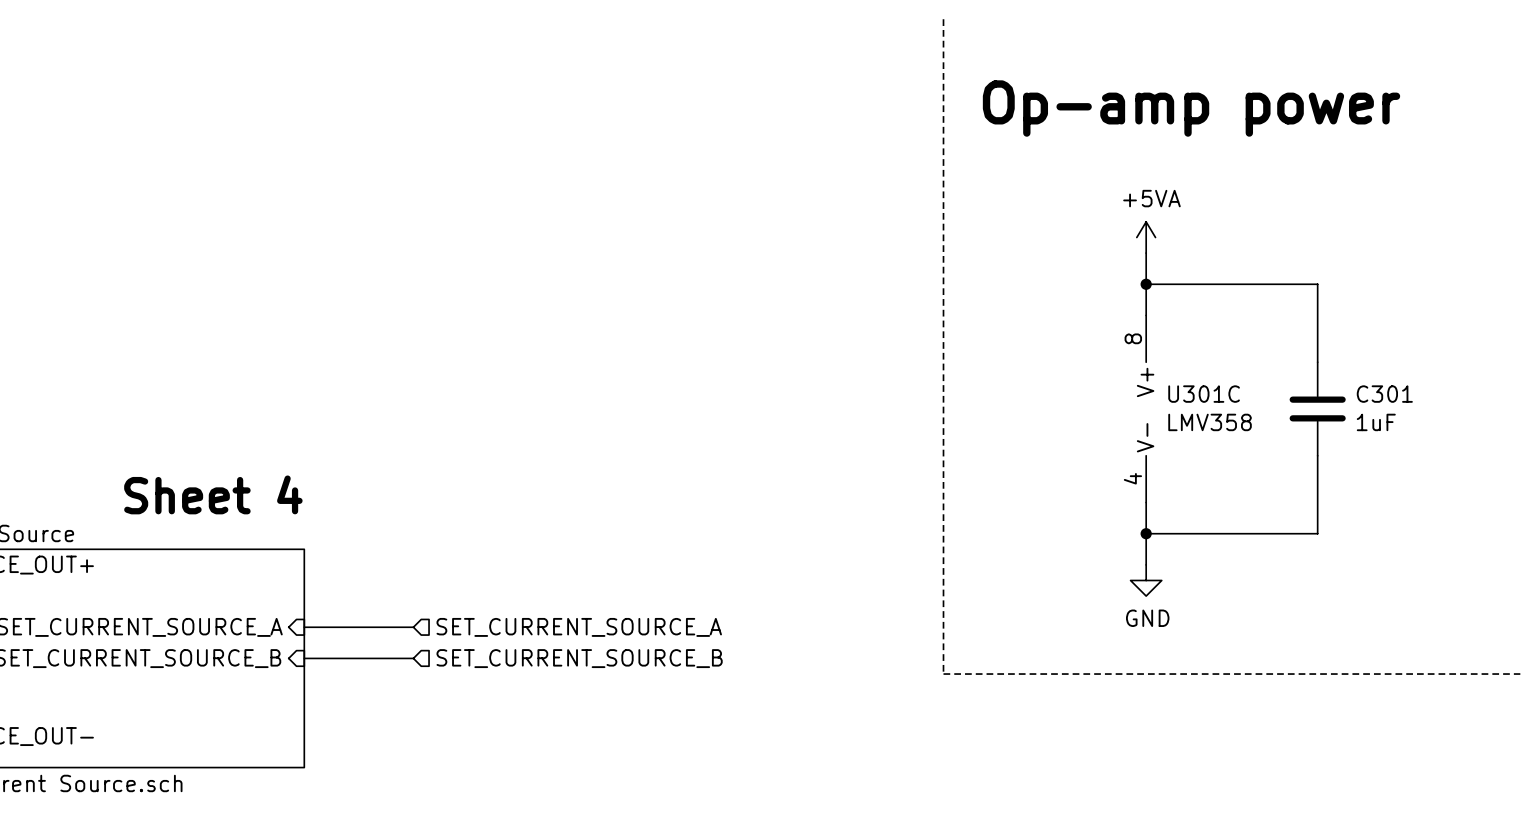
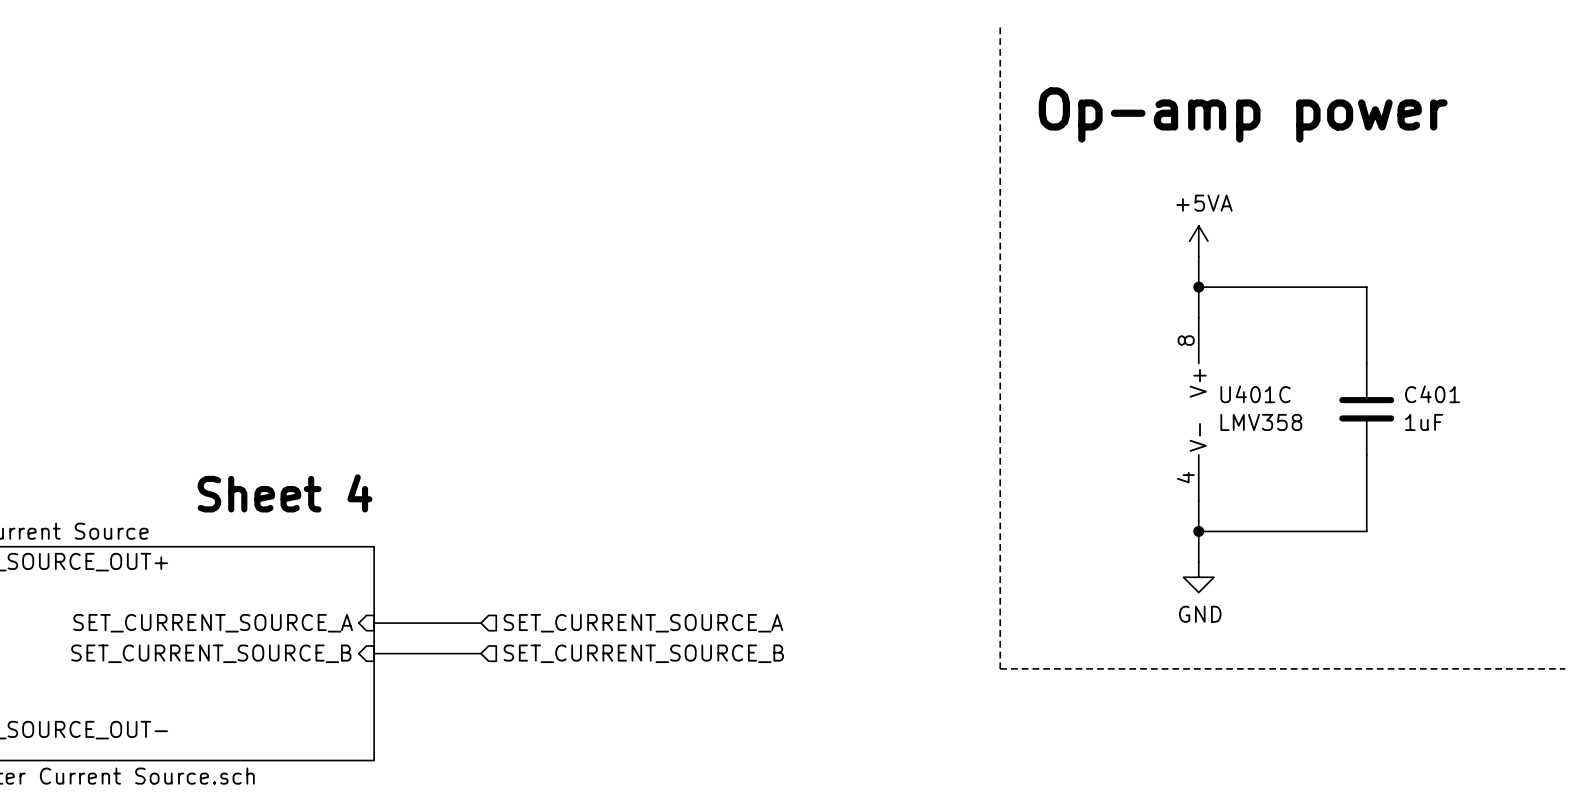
U301C name: U301C (1204, 394) -> U401C (1255, 394)
C301 name: C301 (1384, 394) -> C401 (1432, 394)

